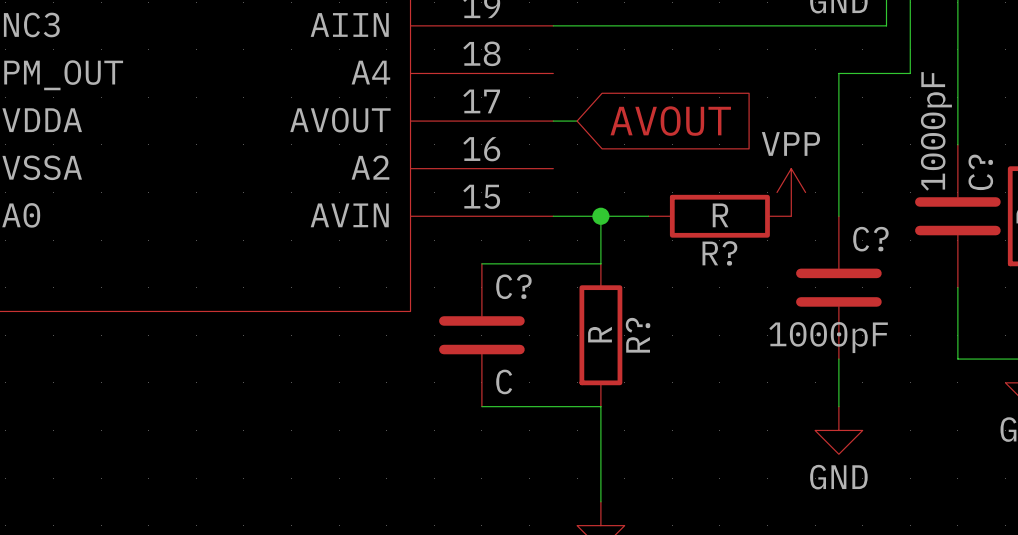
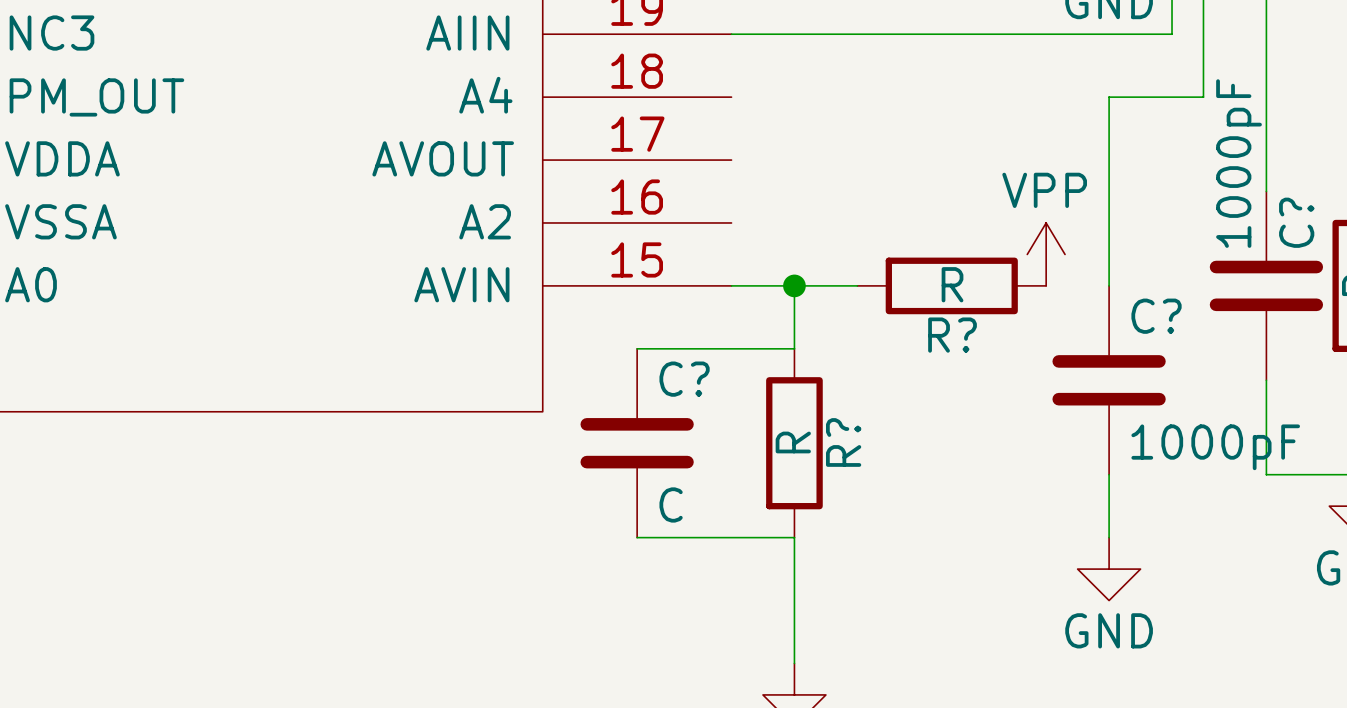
wire: (553, 121) (577, 121) -> none
global label: AVOUT (670, 121) -> none
C? value position: 1000pF (828, 337) -> 1000pF (1215, 447)

